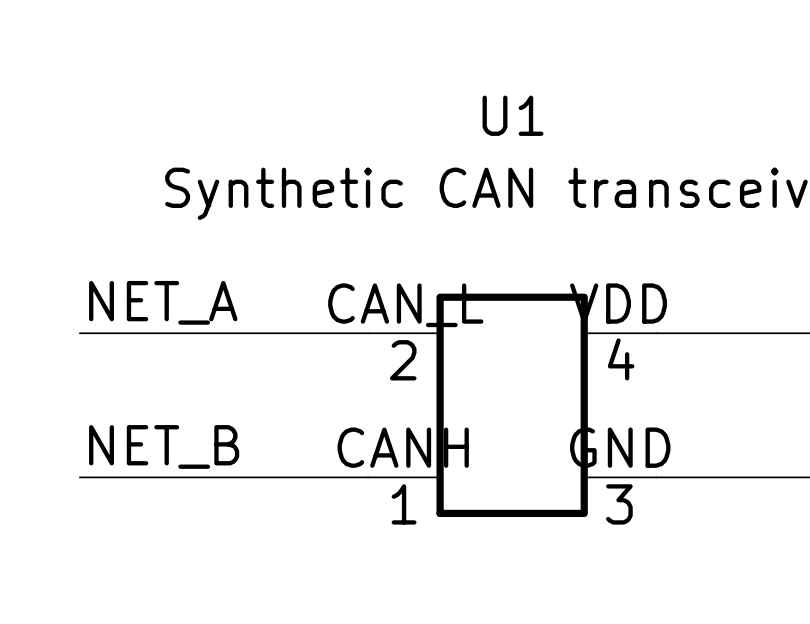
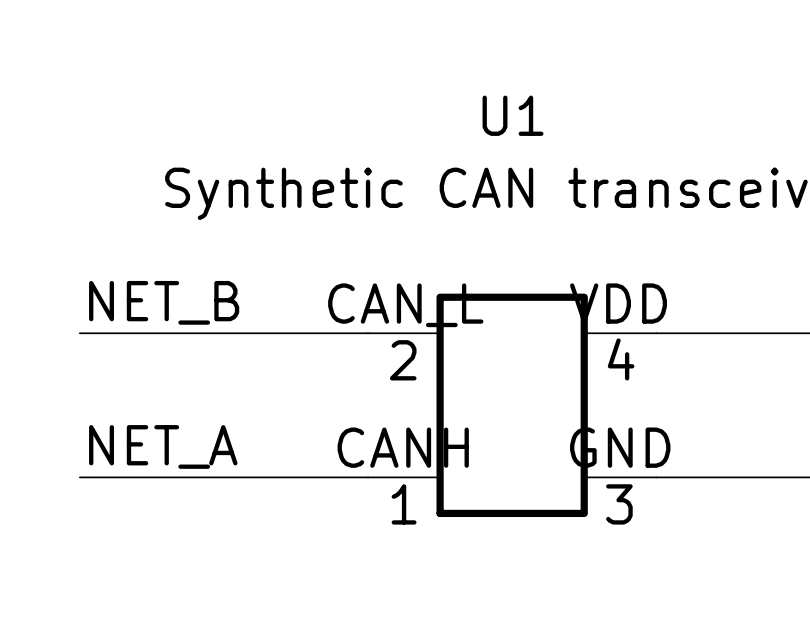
label: NET_A (163, 302) -> NET_B (164, 302)
label: NET_B (164, 446) -> NET_A (163, 446)

